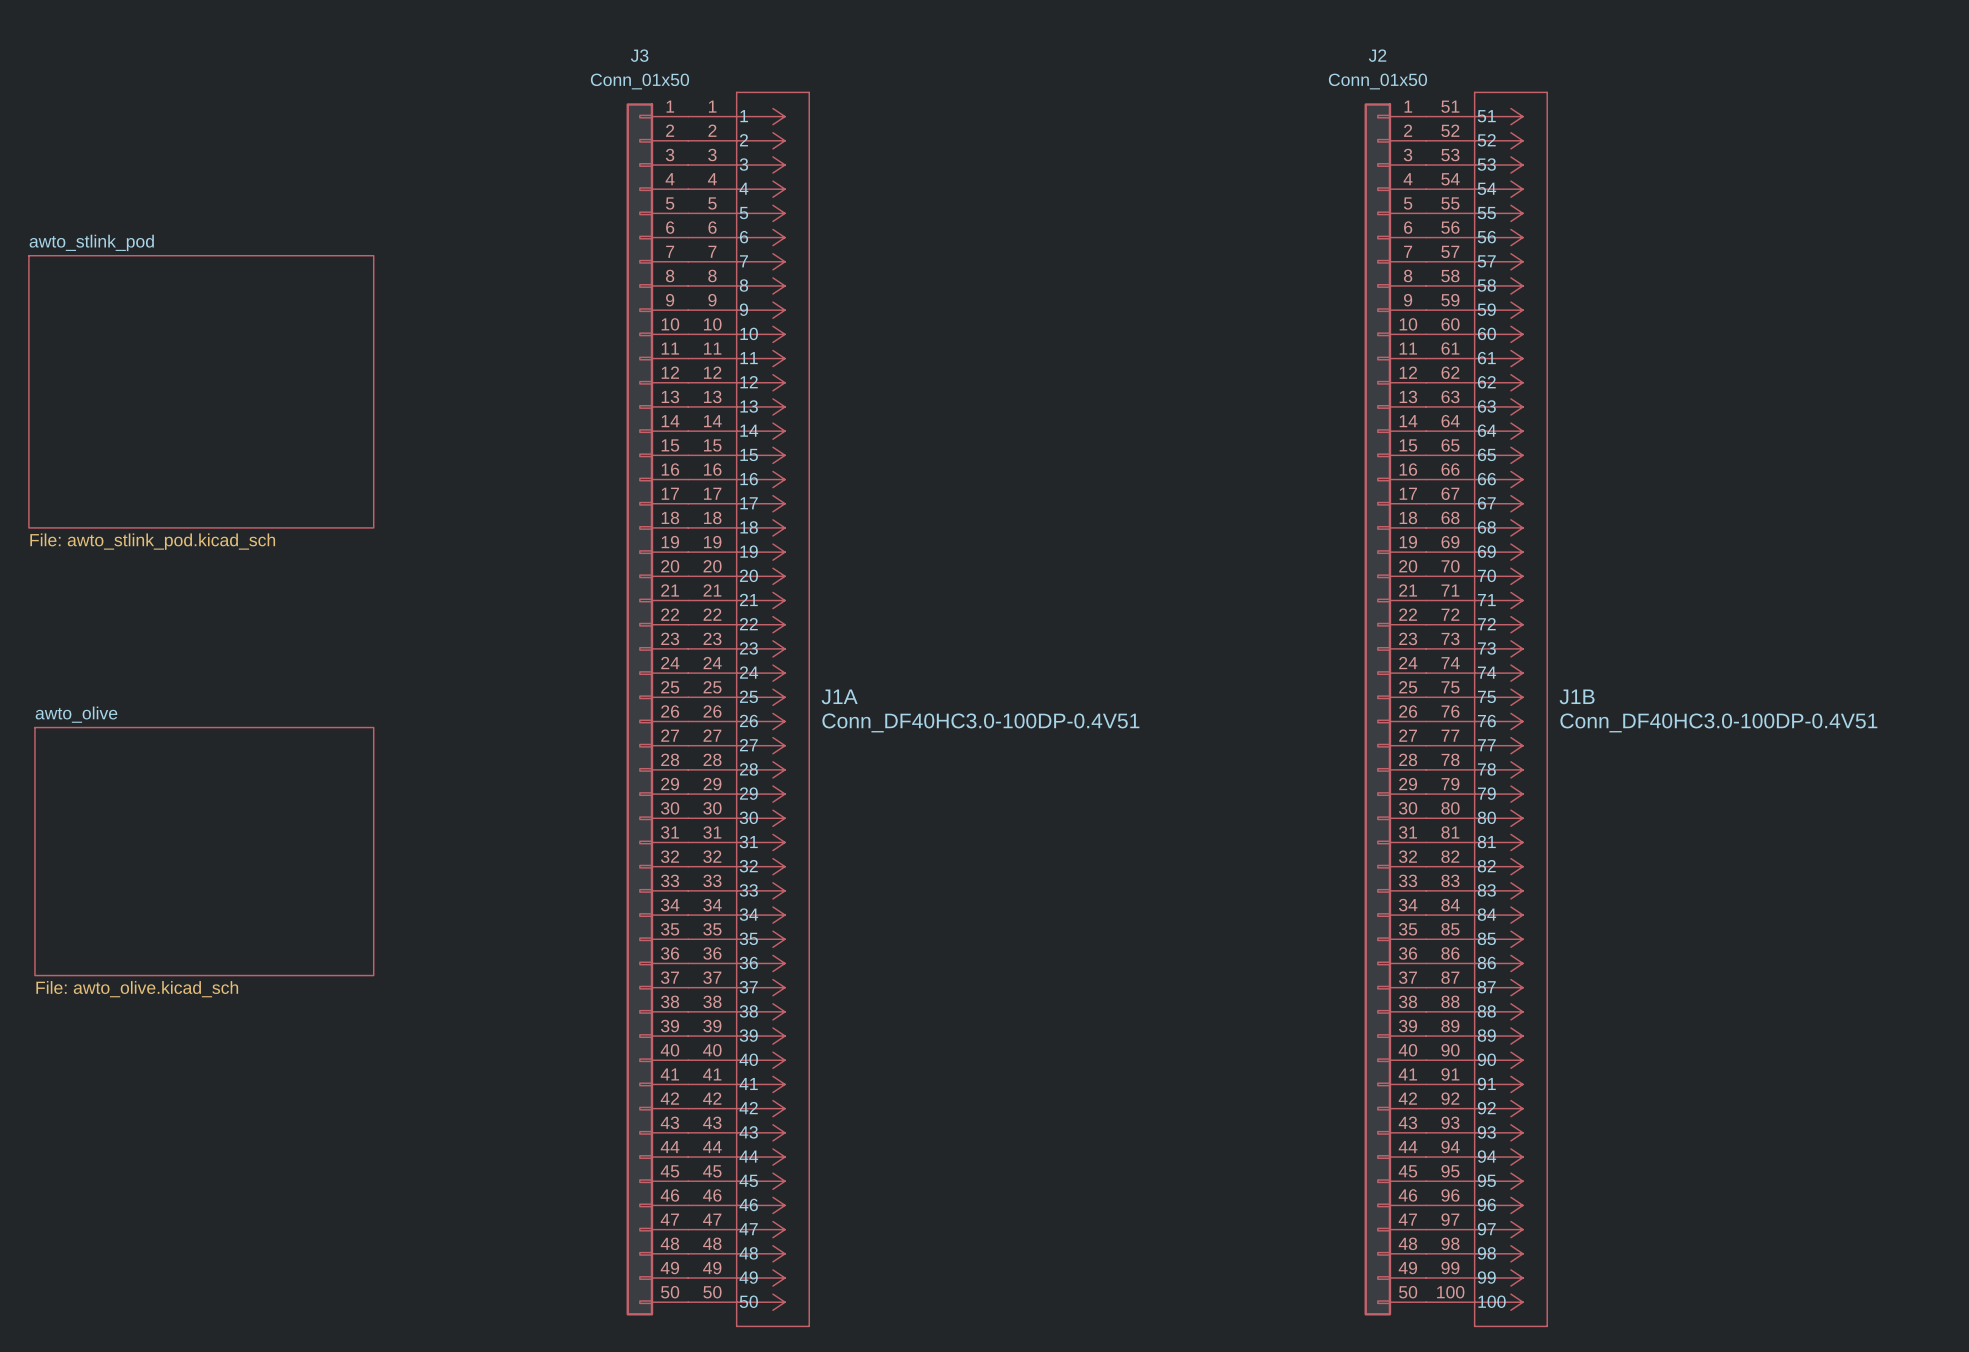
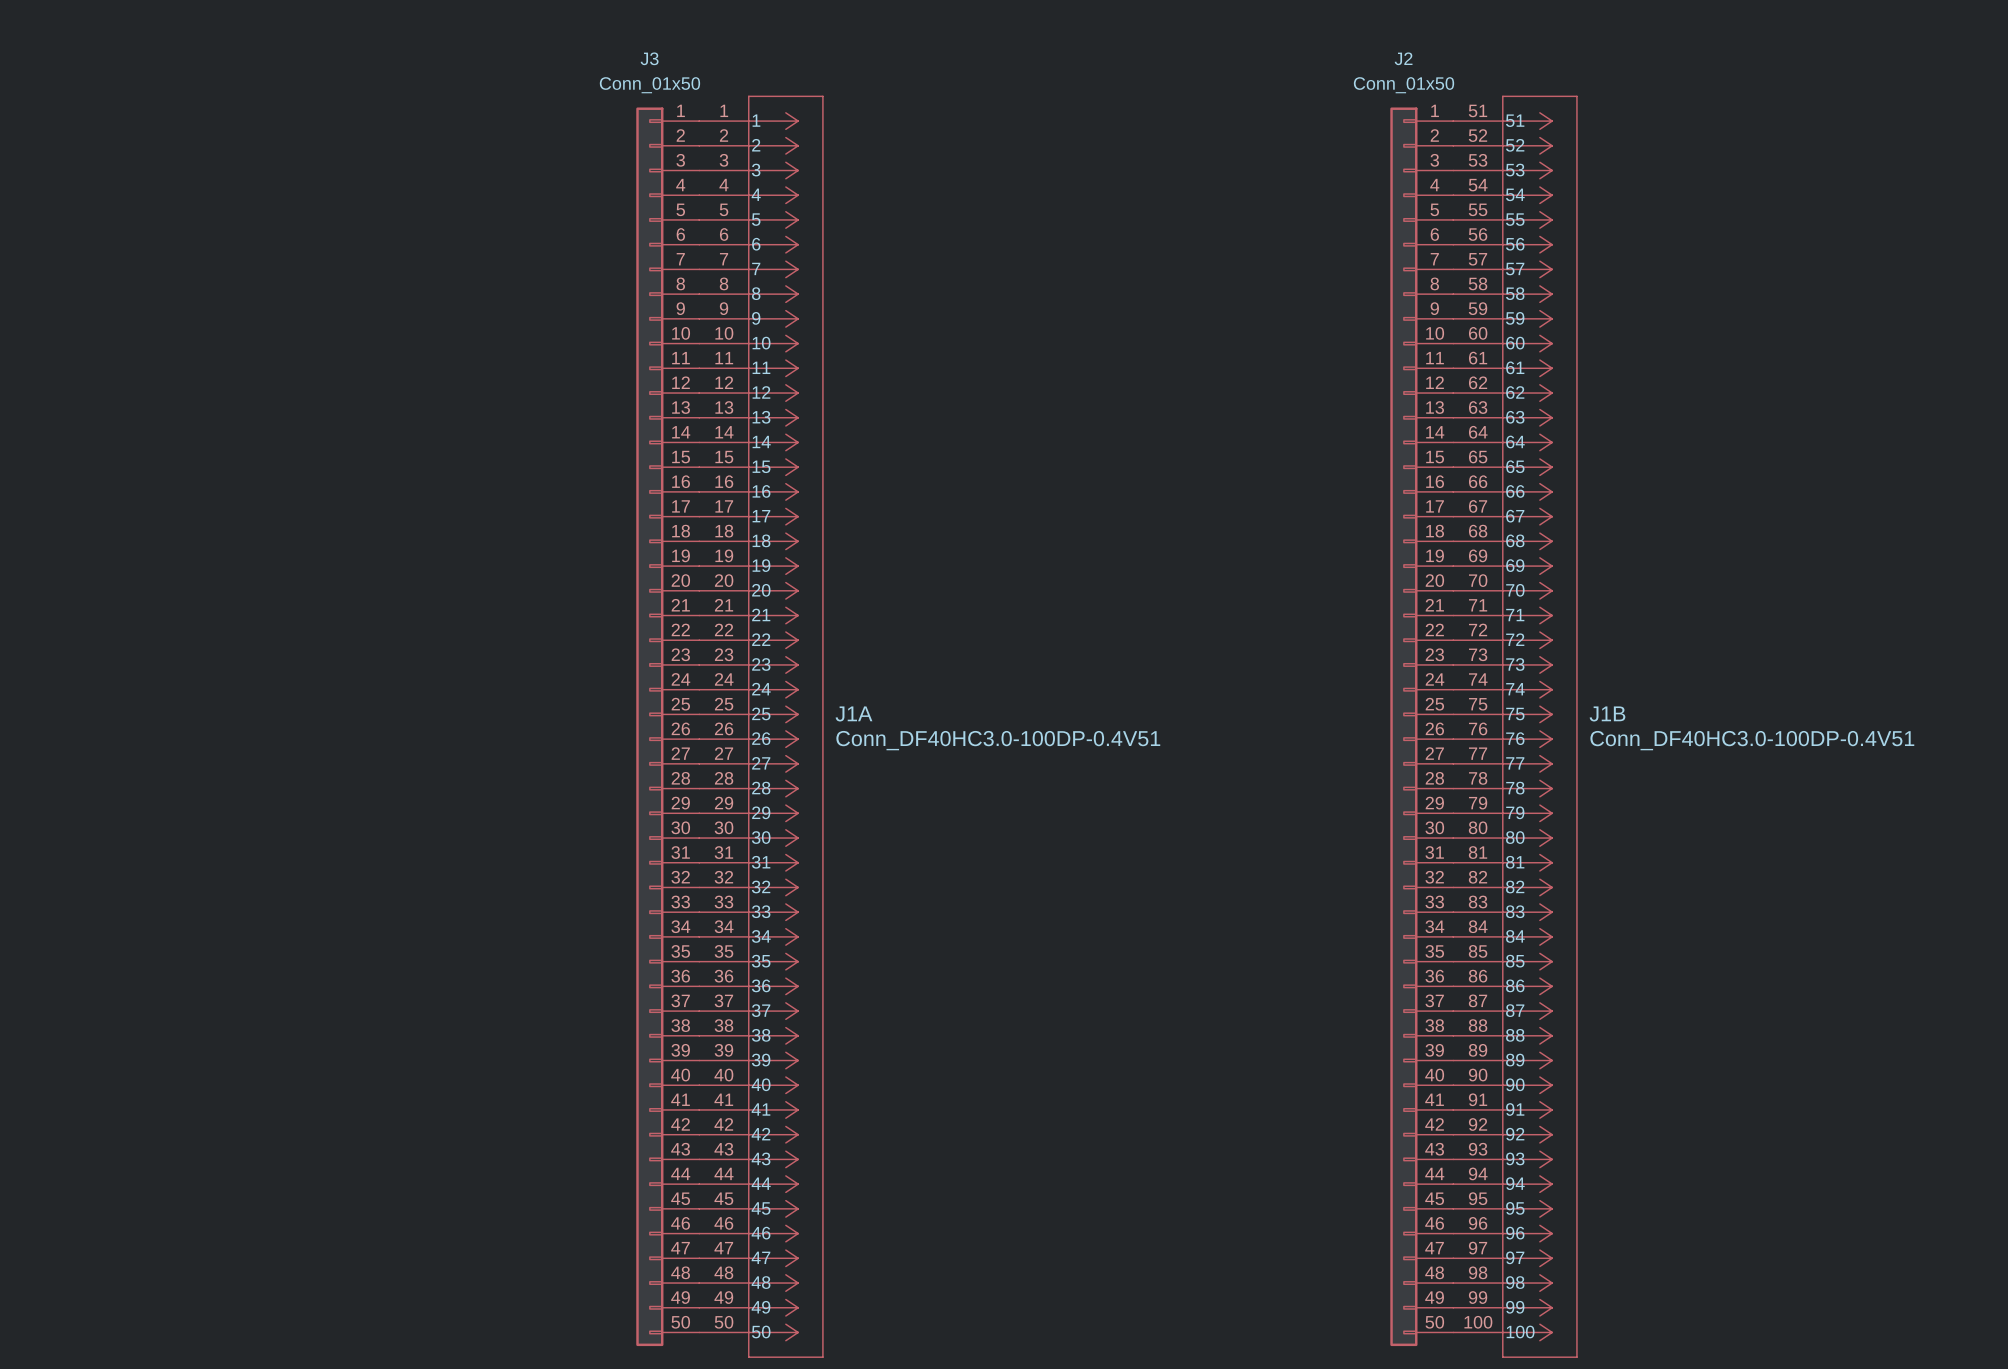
sheet awto_stlink_pod: File: awto_stlink_pod.kicad_sch (201, 391) -> none
sheet awto_olive: File: awto_olive.kicad_sch (204, 851) -> none

